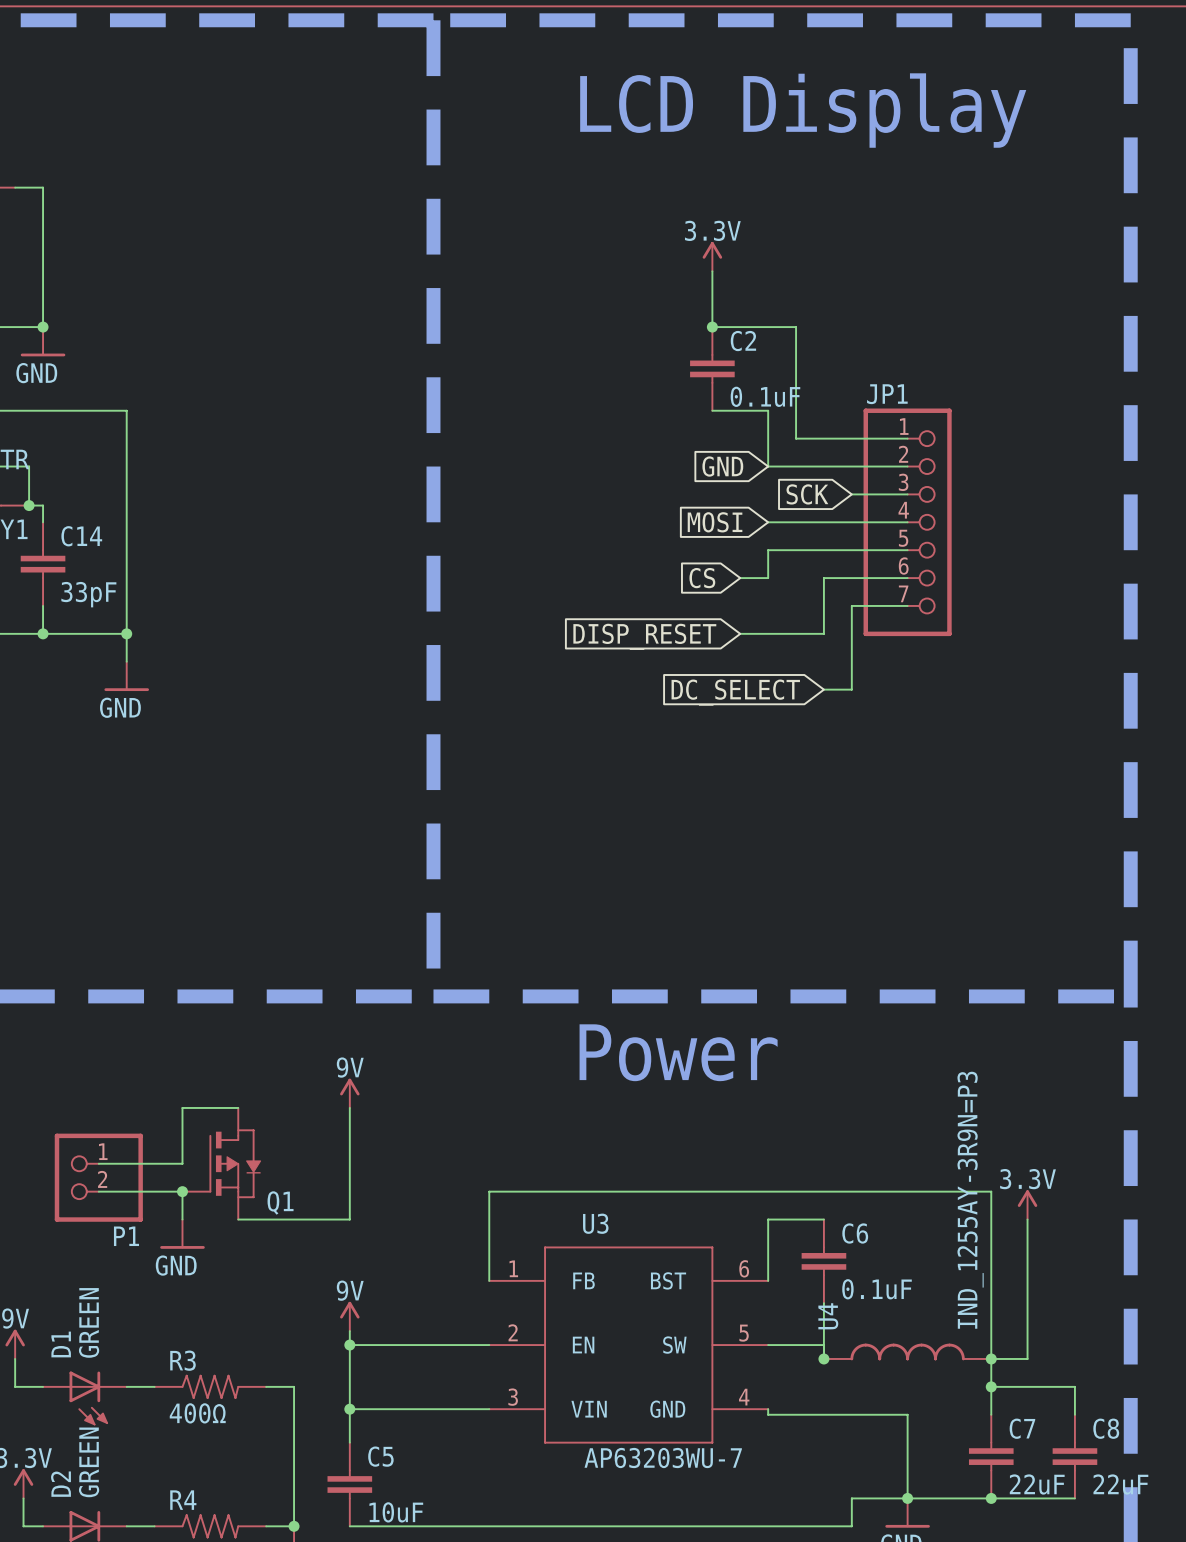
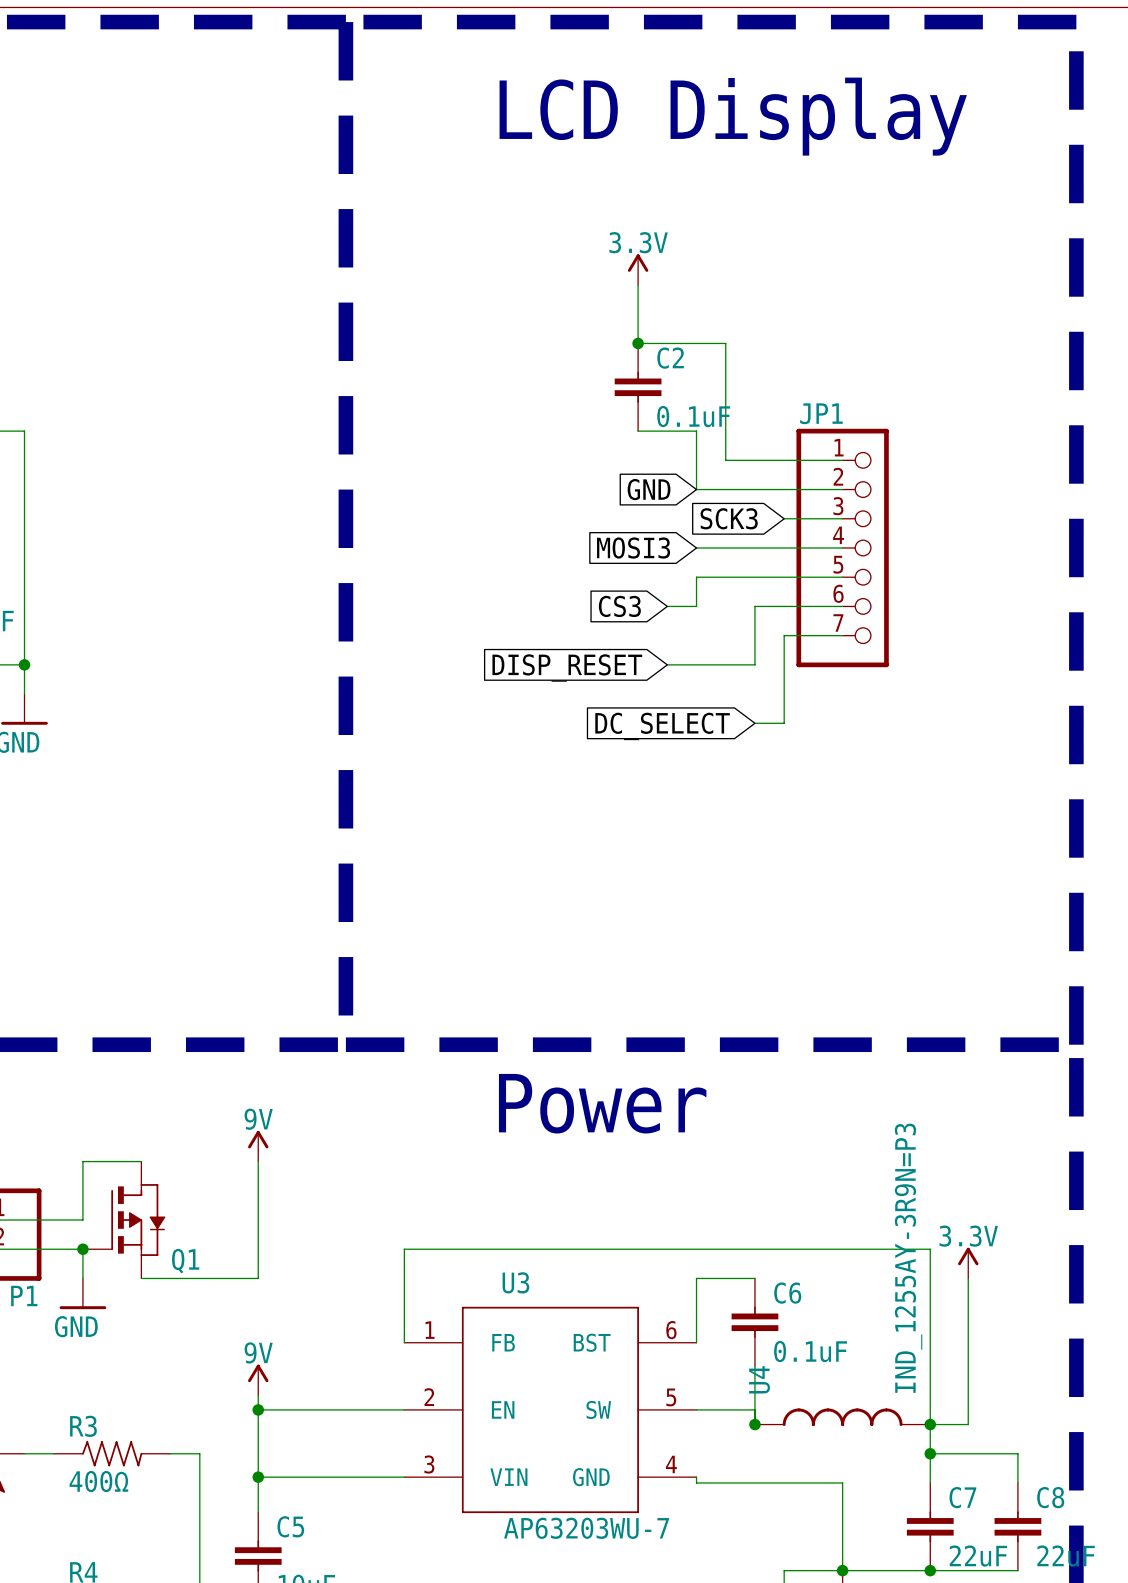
global label: SCK (807, 494) -> SCK3 (729, 518)
global label: MOSI (715, 522) -> MOSI3 (633, 548)
global label: CS (702, 578) -> CS3 (619, 606)

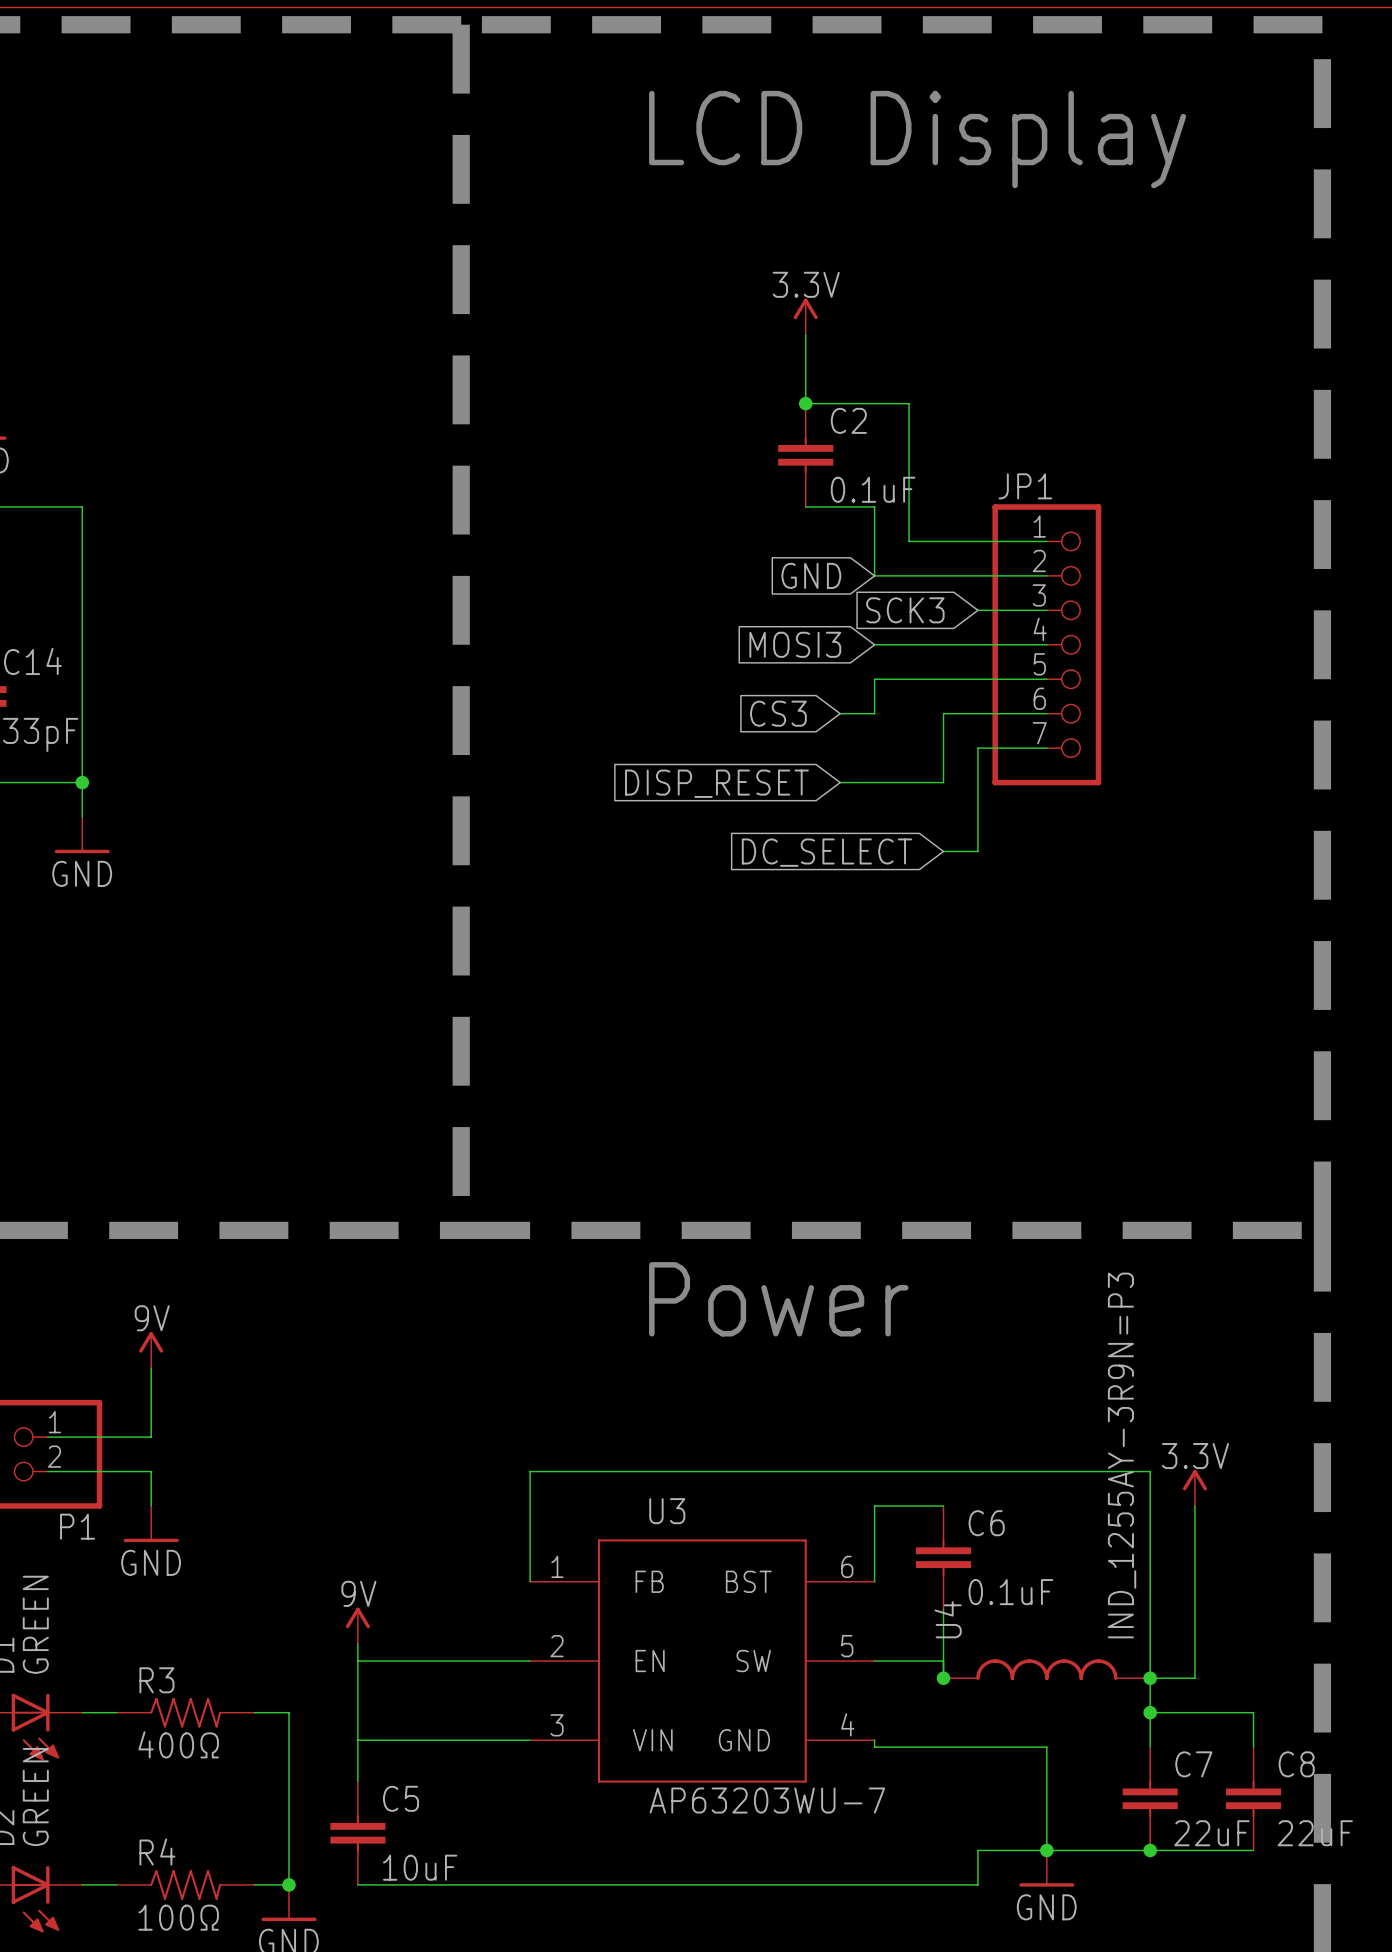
power symbol position: 9V (258, 1146) -> 9V (151, 1350)
wire: (82, 1161) (141, 1161) -> none
wire: (258, 1161) (258, 1278) (141, 1278) -> none
Q1: (124, 1220) -> none
junction: (82, 1249) -> none
junction: (258, 1409) -> none
junction: (258, 1477) -> none

